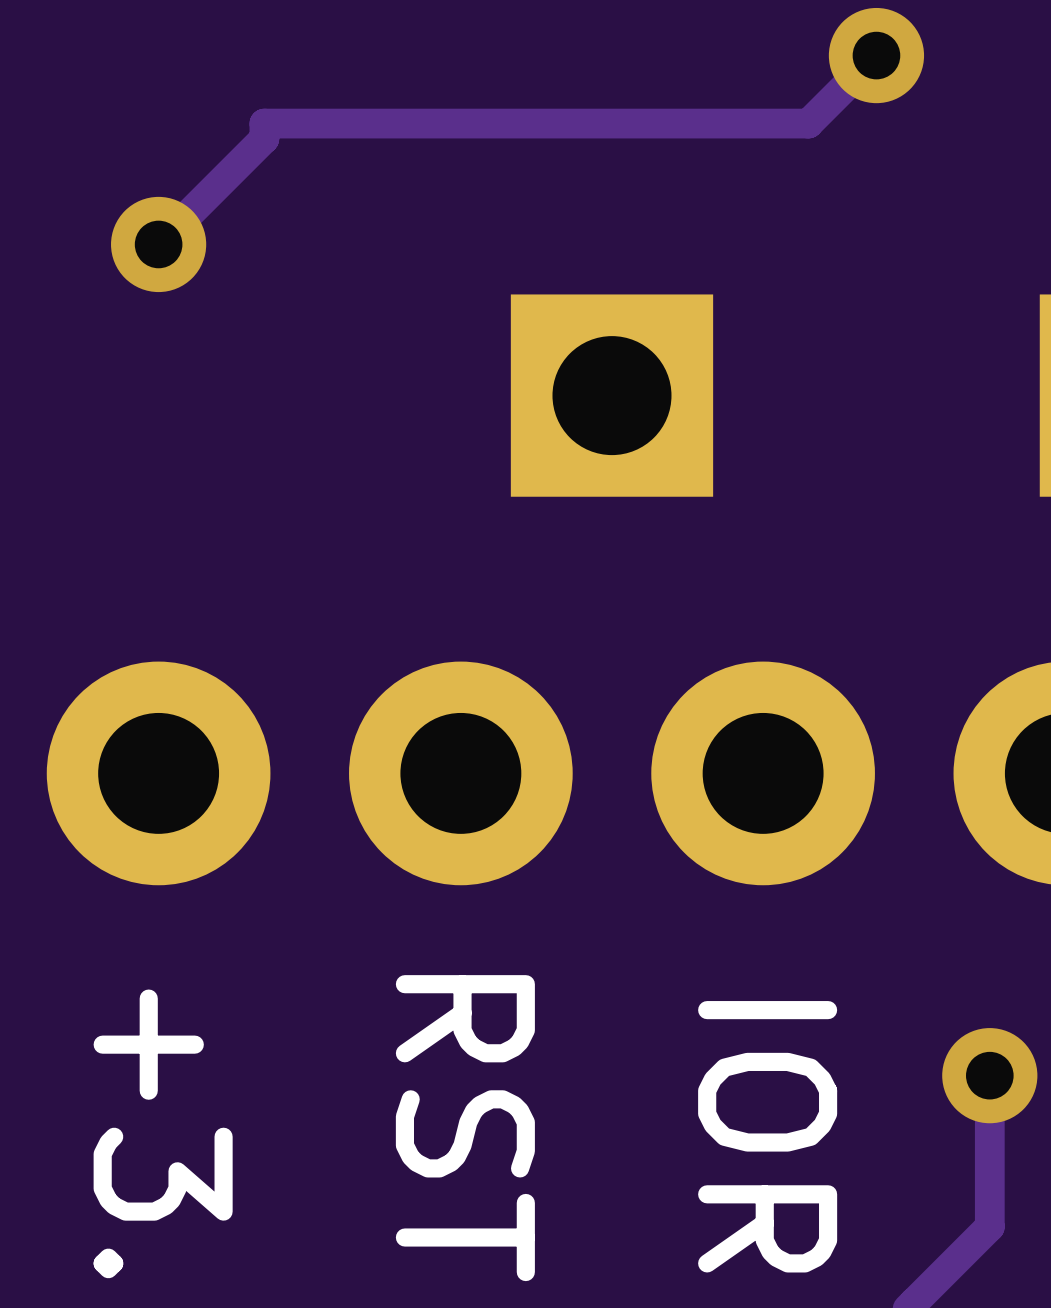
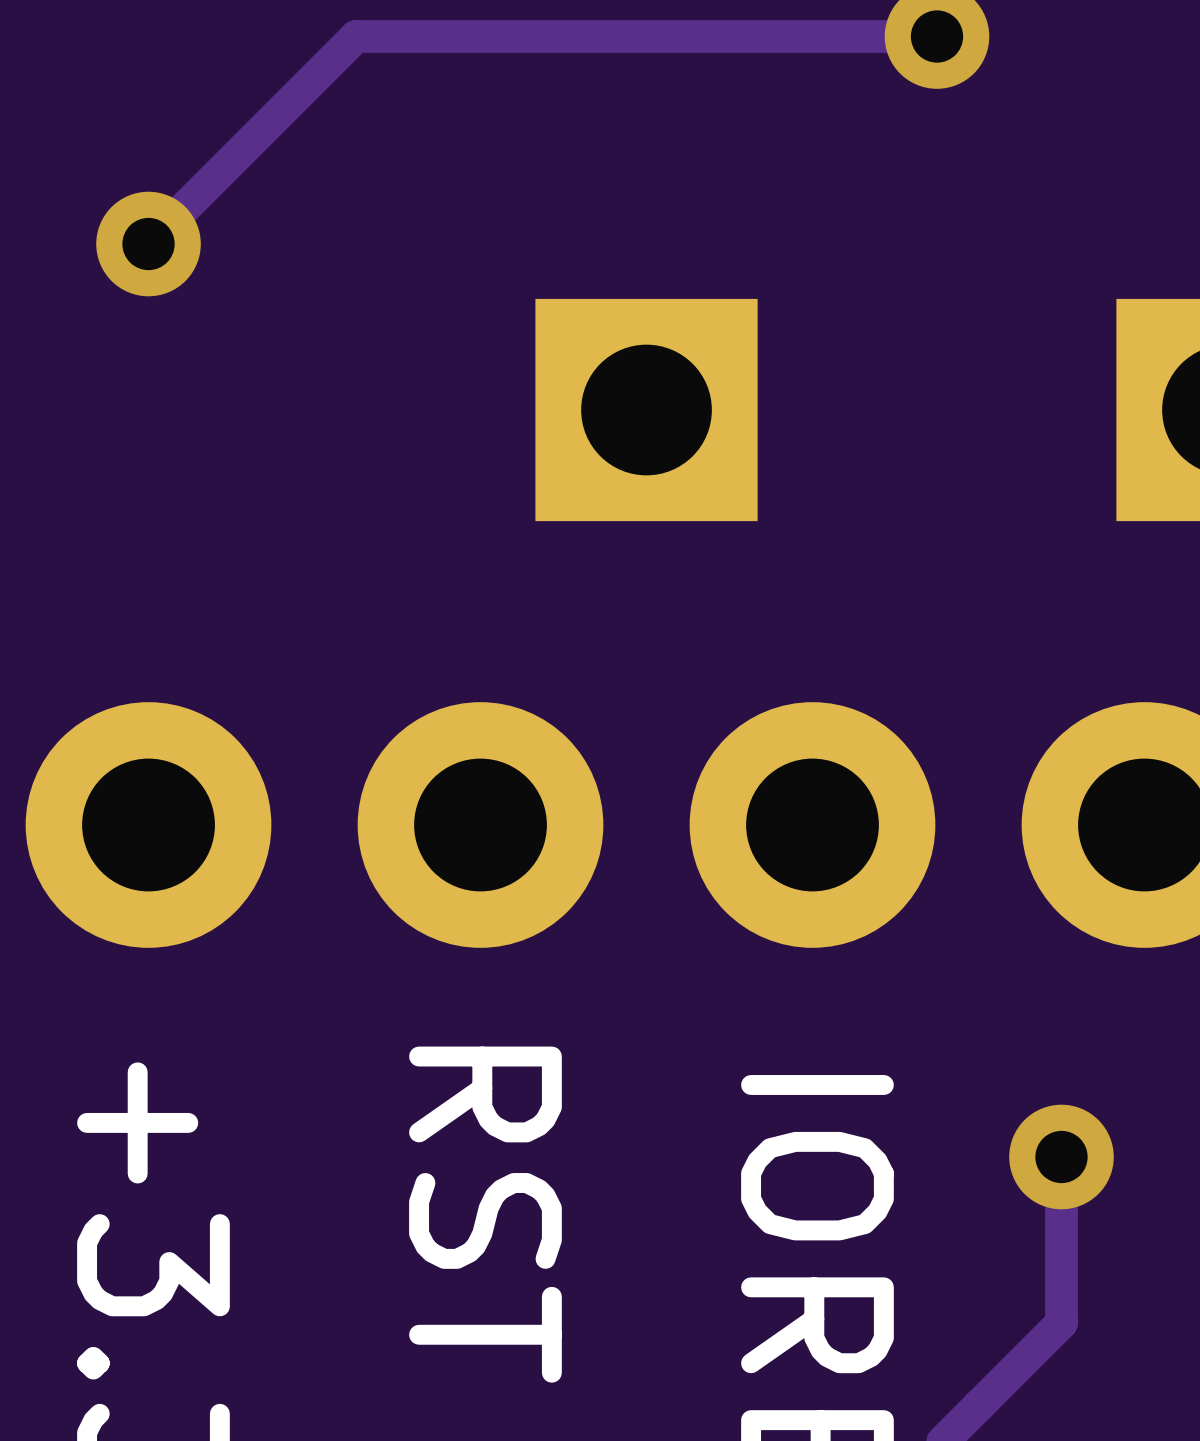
track: (876, 55) (808, 123) (264, 123) (264, 138) -> (937, 36) (356, 36) (264, 127)

